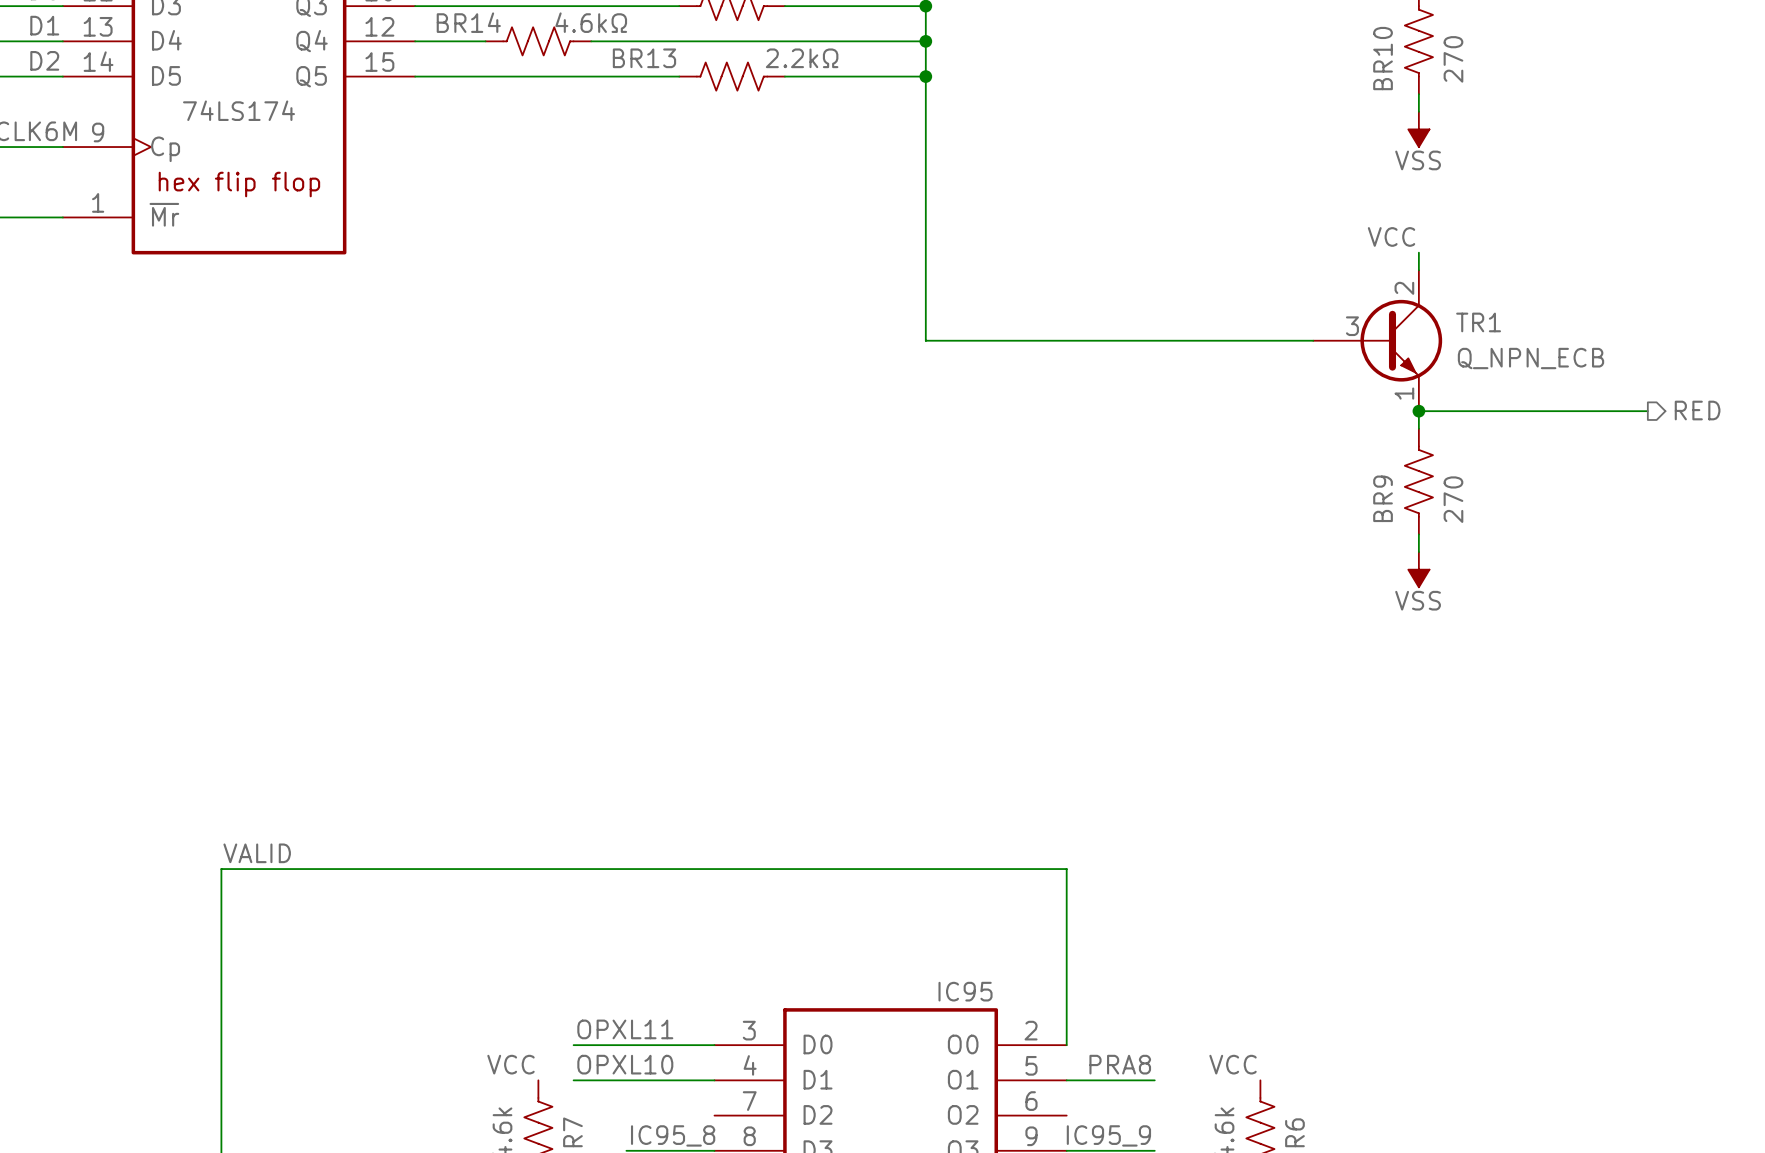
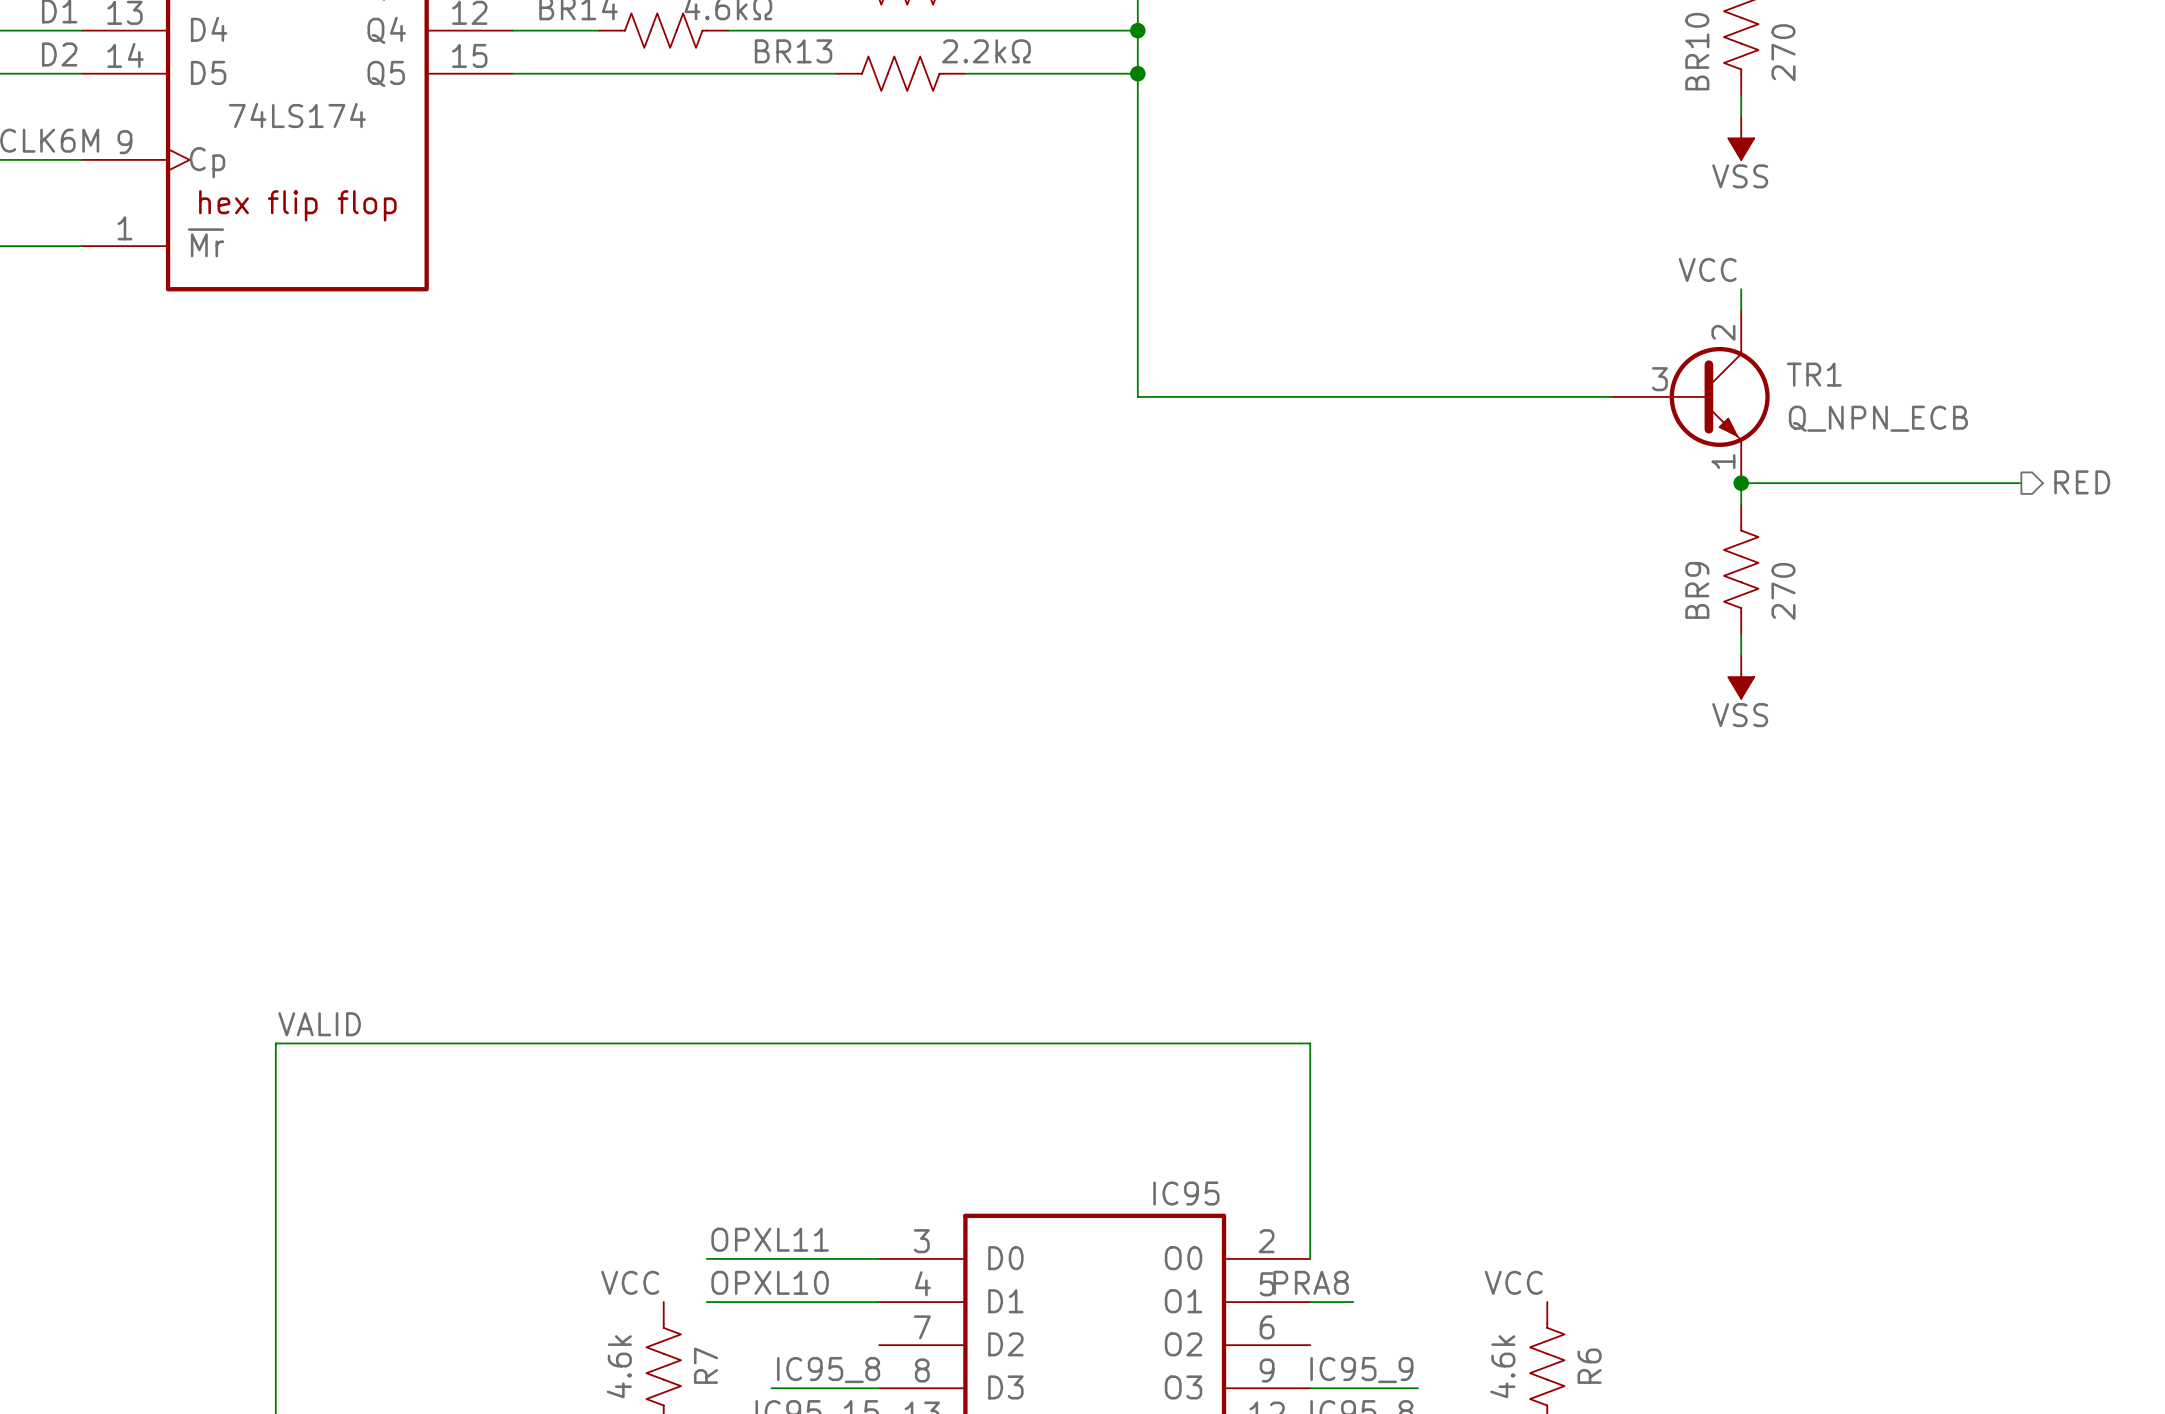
label position: PRA8 (1120, 1064) -> PRA8 (1311, 1282)
wire: (1101, 1080) (1154, 1080) -> none

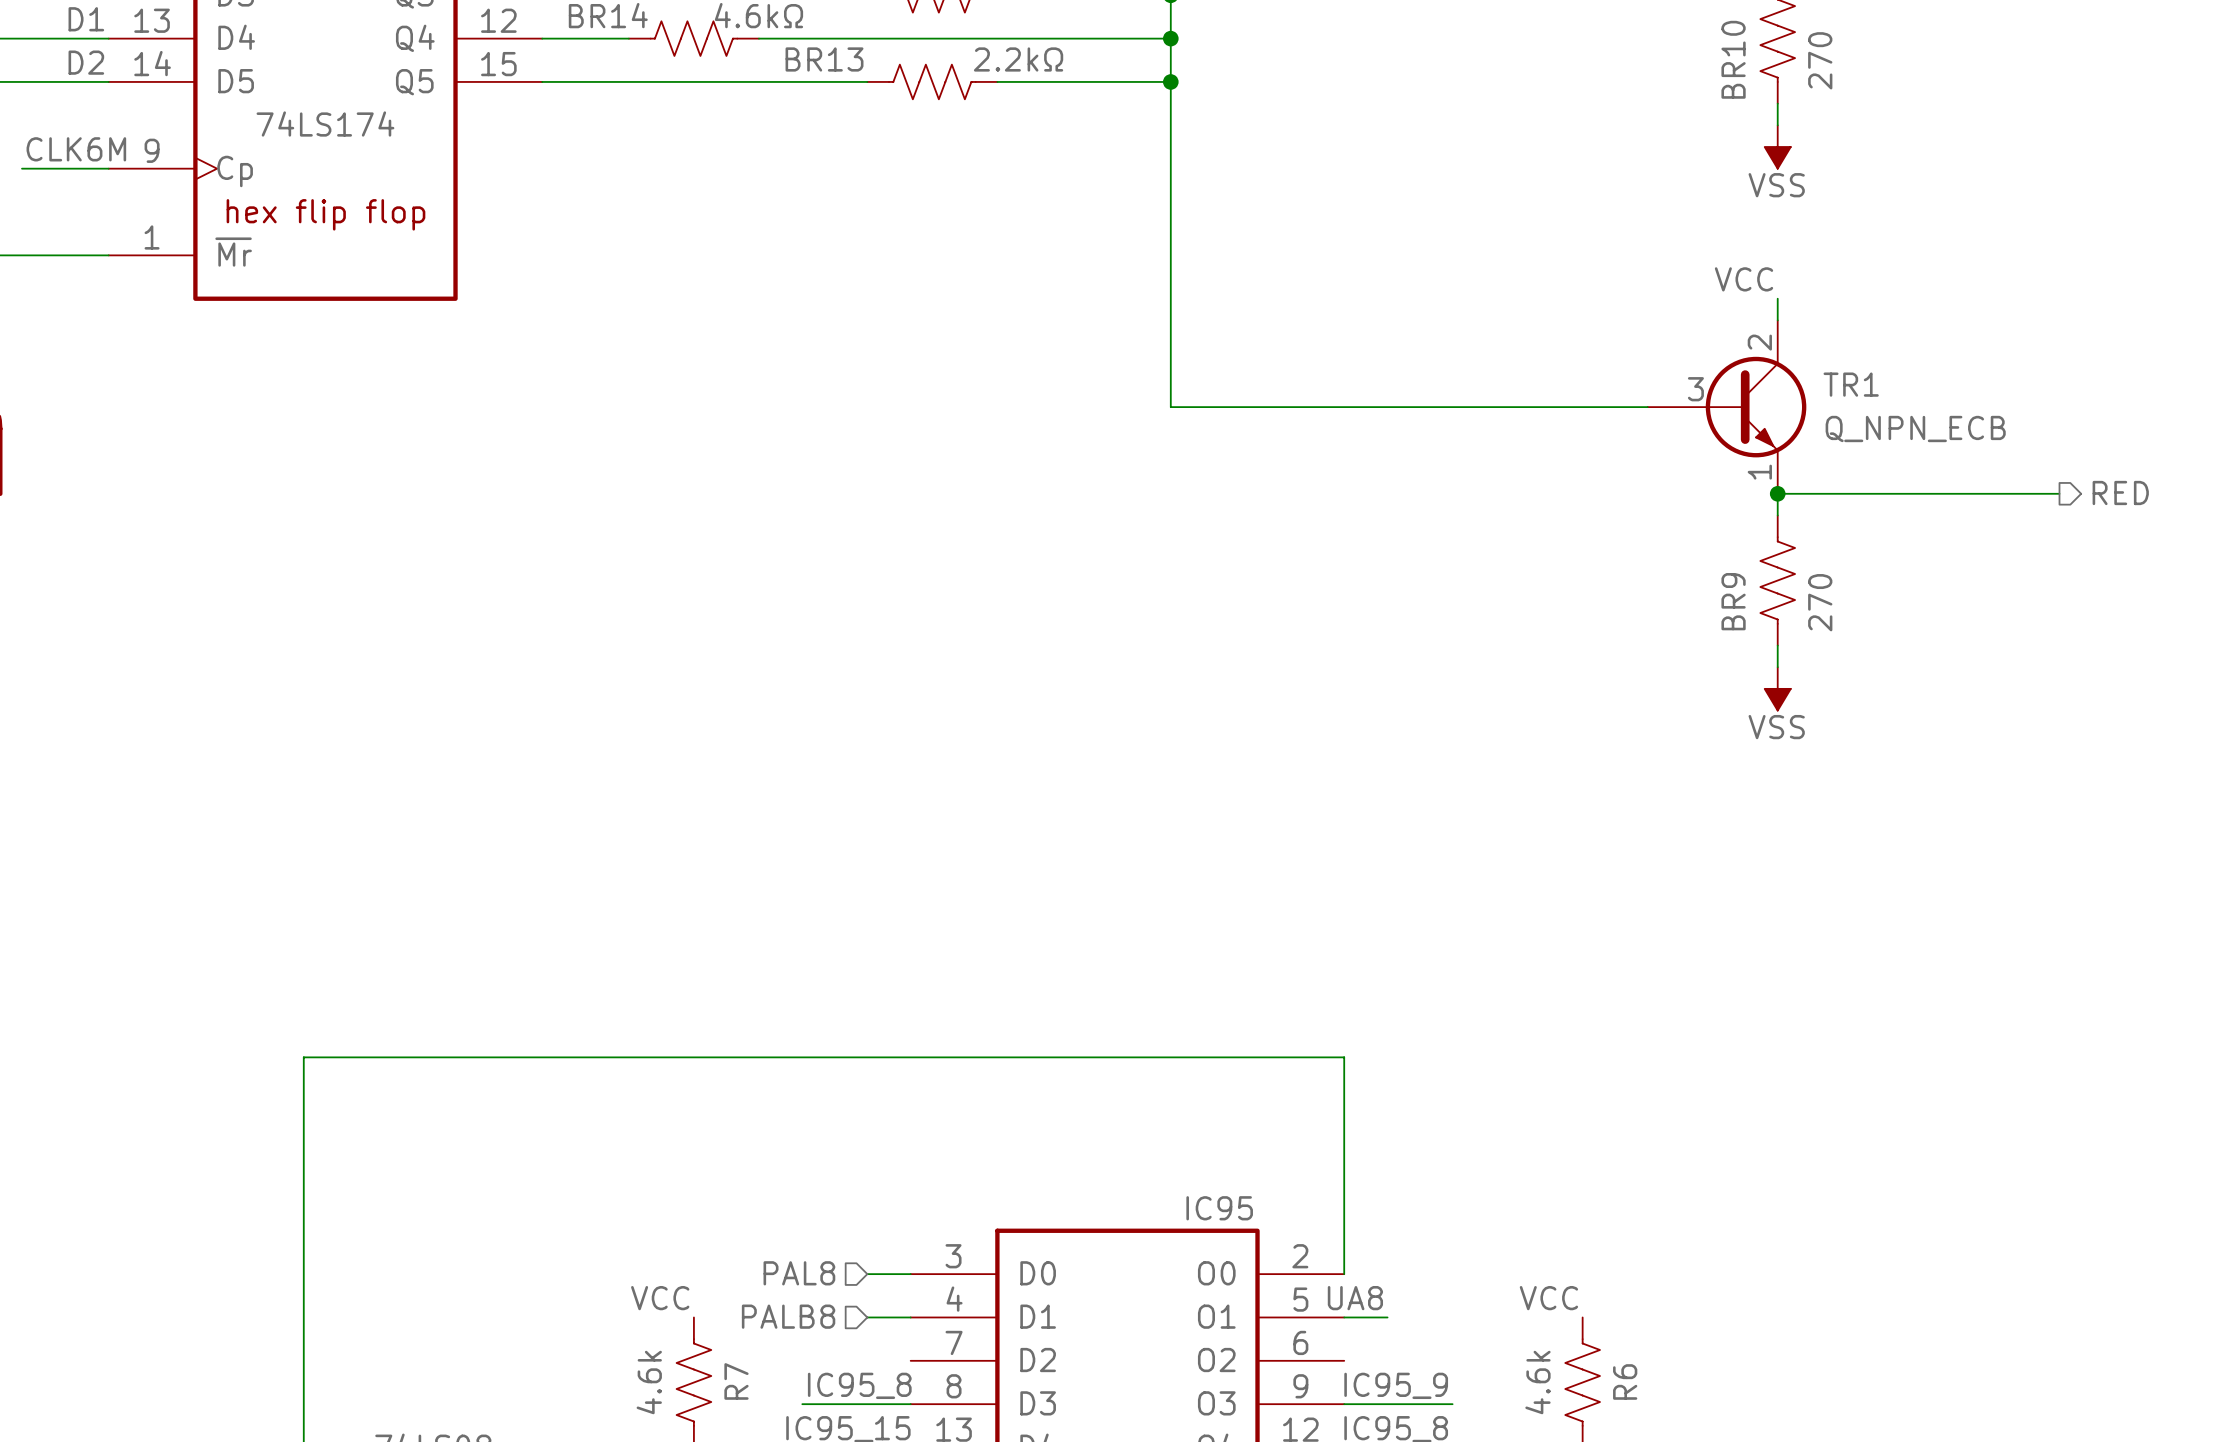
label: VALID (319, 1024) -> none
label: OPXL11 (770, 1239) -> none
wire: (706, 1258) (836, 1258) -> none
hierarchical label: none -> PAL8 (799, 1273)
label: OPXL10 (770, 1282) -> none
label: PRA8 (1311, 1282) -> UA8 (1355, 1298)
hierarchical label: none -> PALB8 (788, 1316)
wire: (706, 1302) (836, 1302) -> none

